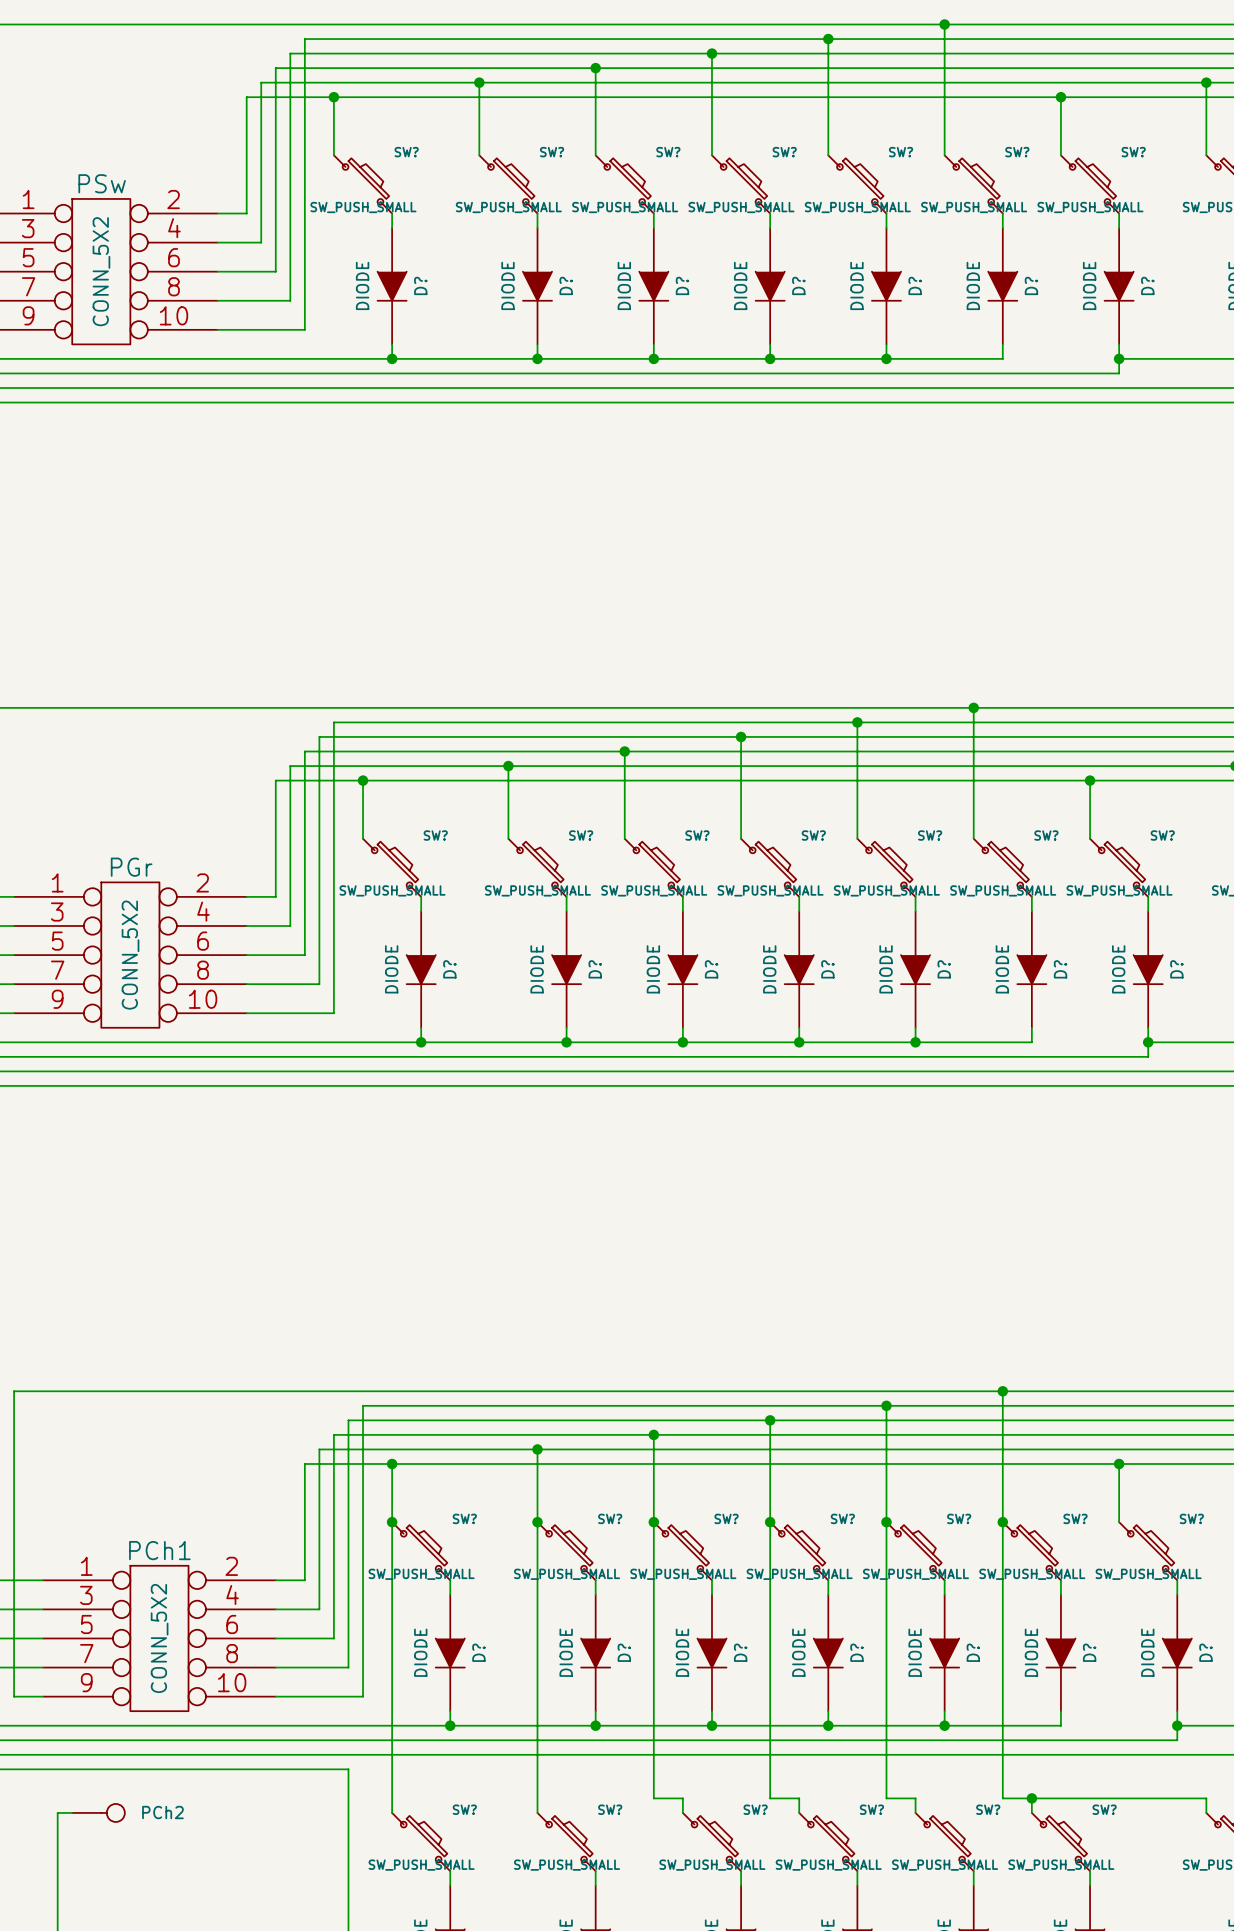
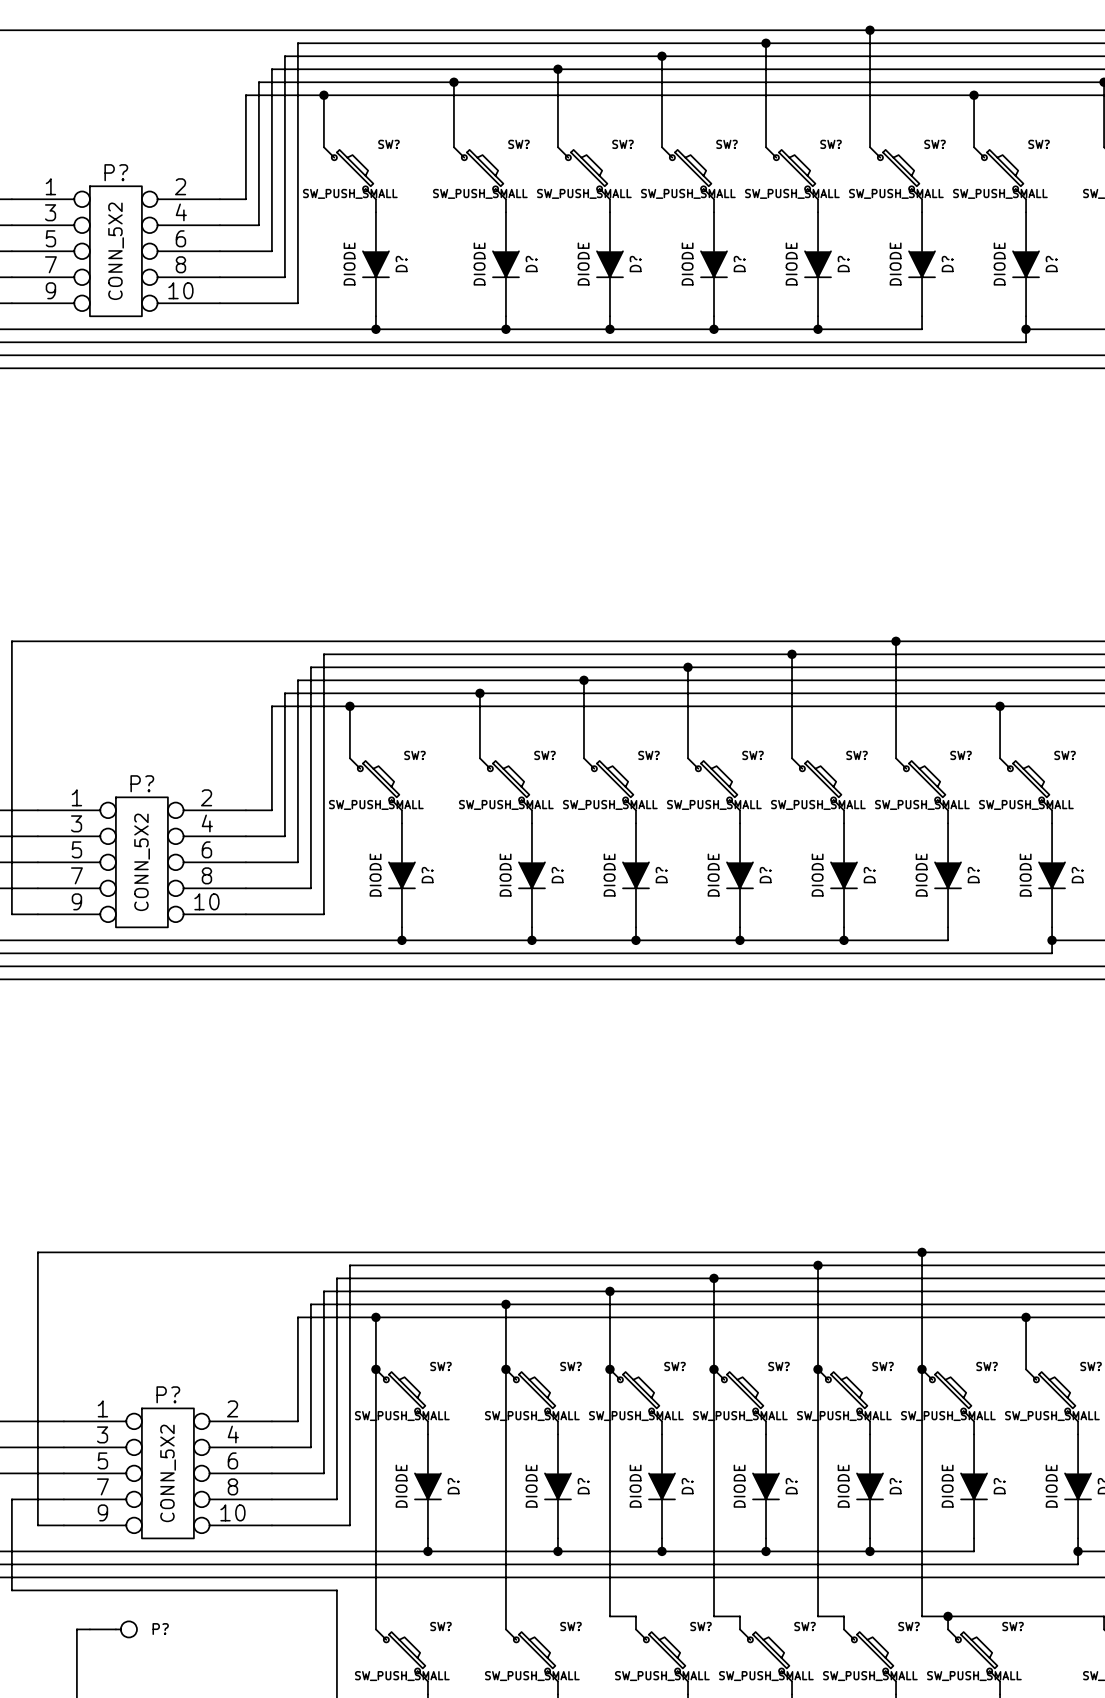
PSw name: PSw (102, 183) -> P? (116, 172)
PGr name: PGr (131, 867) -> P? (142, 783)
PCh1 name: PCh1 (159, 1550) -> P? (168, 1394)
PCh2 name: PCh2 (162, 1812) -> P? (160, 1629)

